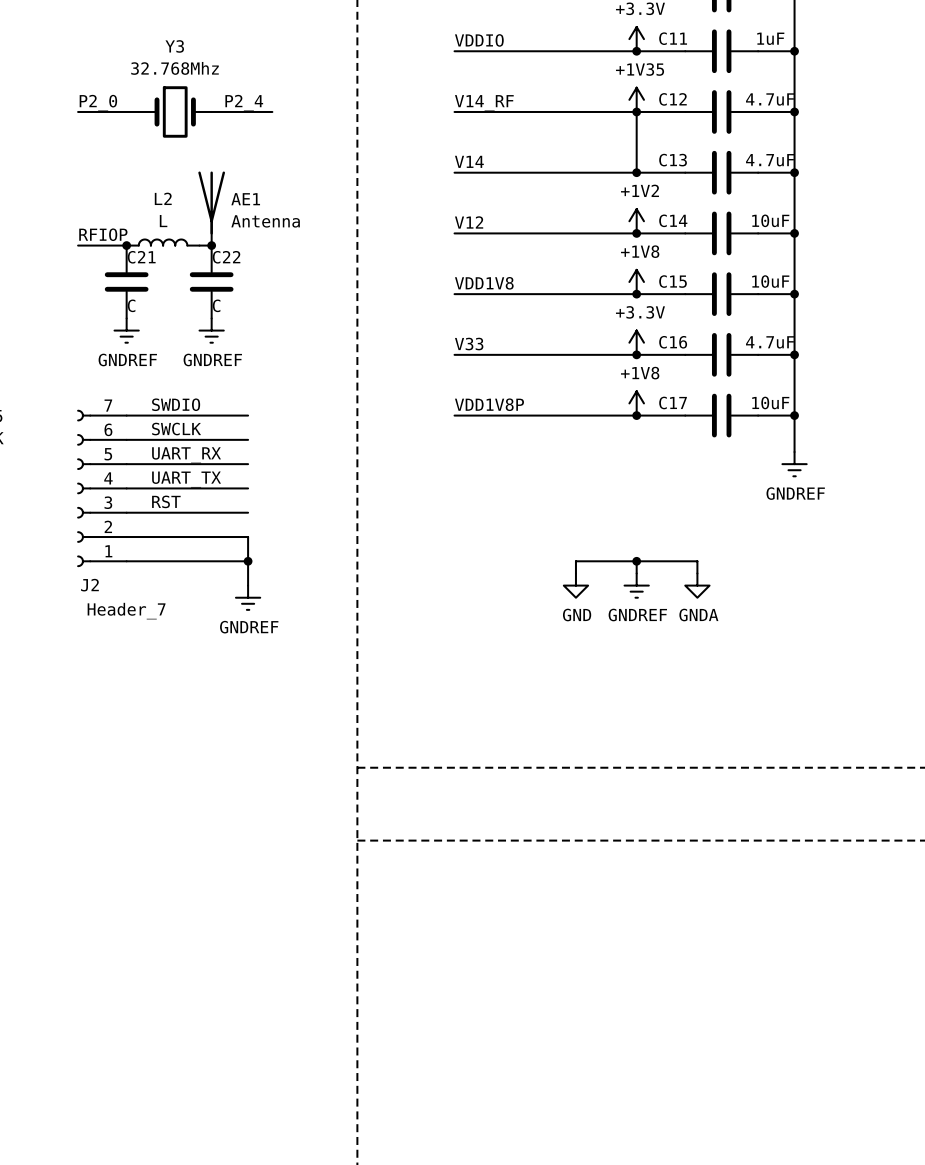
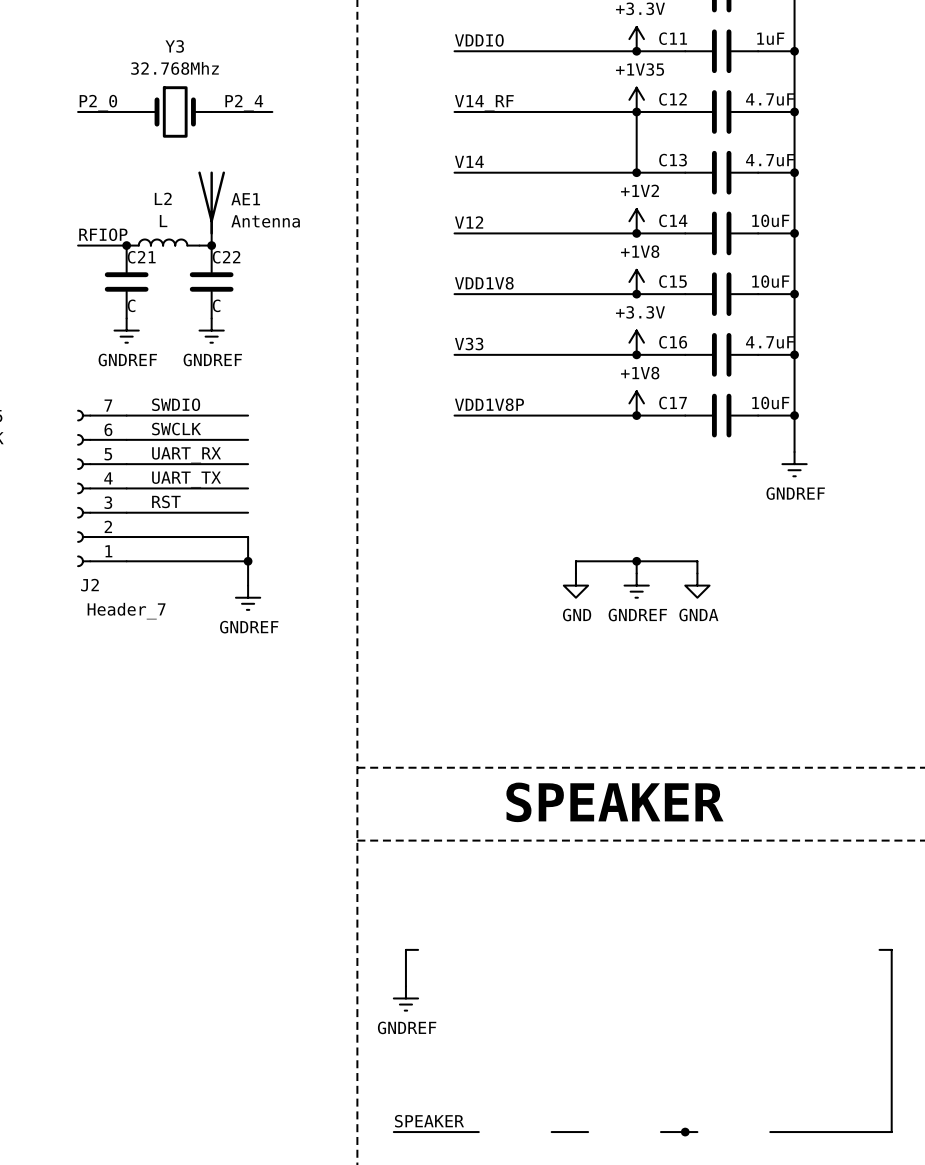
text: none -> SPEAKER (614, 802)
wire: none -> (418, 949) (405, 949) (405, 986)
wire: none -> (879, 949) (891, 949) (891, 1132) (770, 1132)
power symbol: none -> GNDREF (405, 998)
label: none -> SPEAKER (429, 1121)
wire: none -> (393, 1132) (478, 1132)
wire: none -> (551, 1132) (588, 1132)
wire: none -> (660, 1132) (697, 1132)
junction: none -> (685, 1132)

